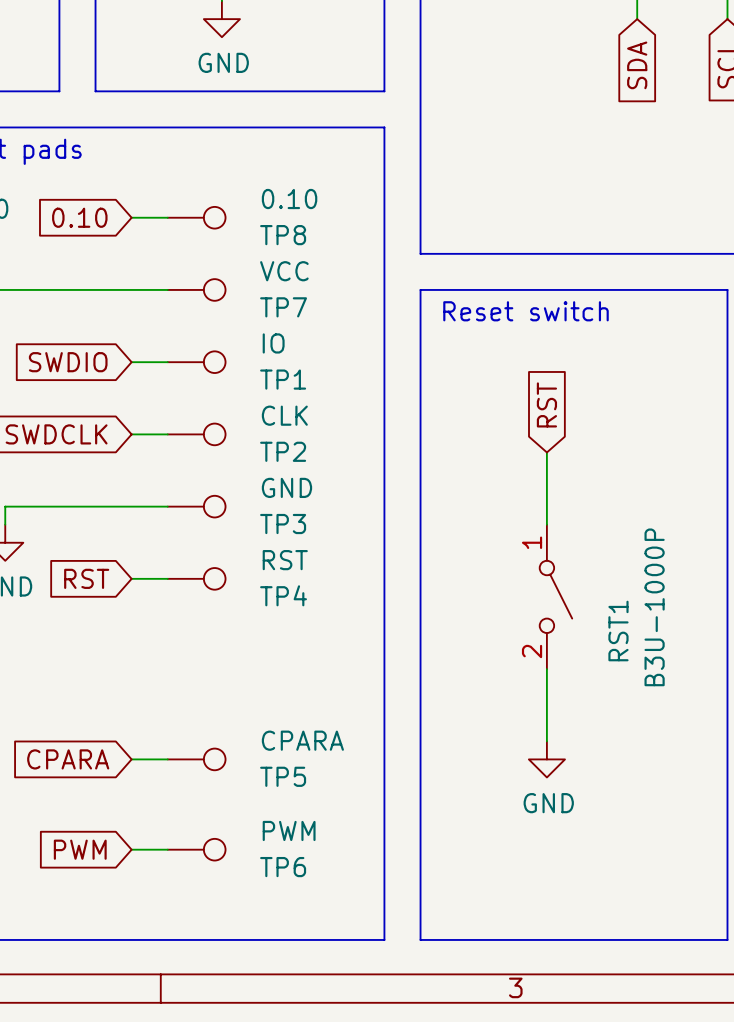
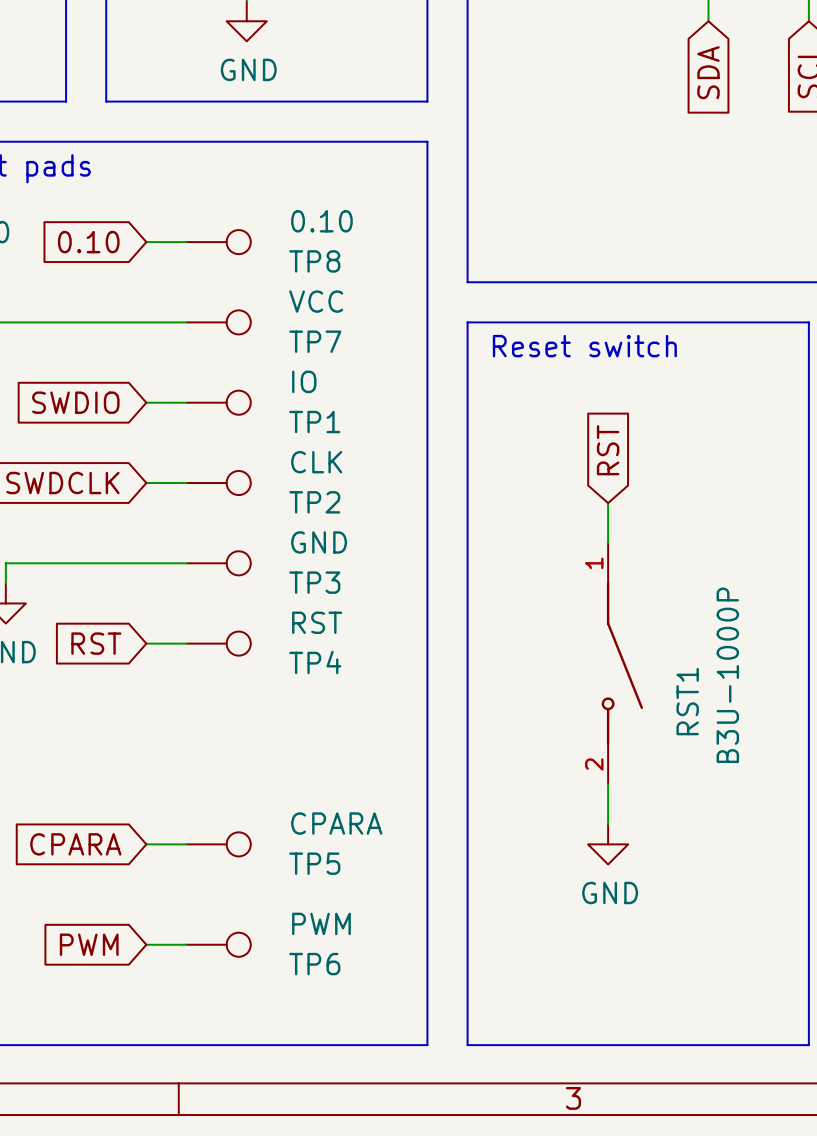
RST1 symbol: [539, 524, 573, 670] -> [601, 543, 644, 785]

